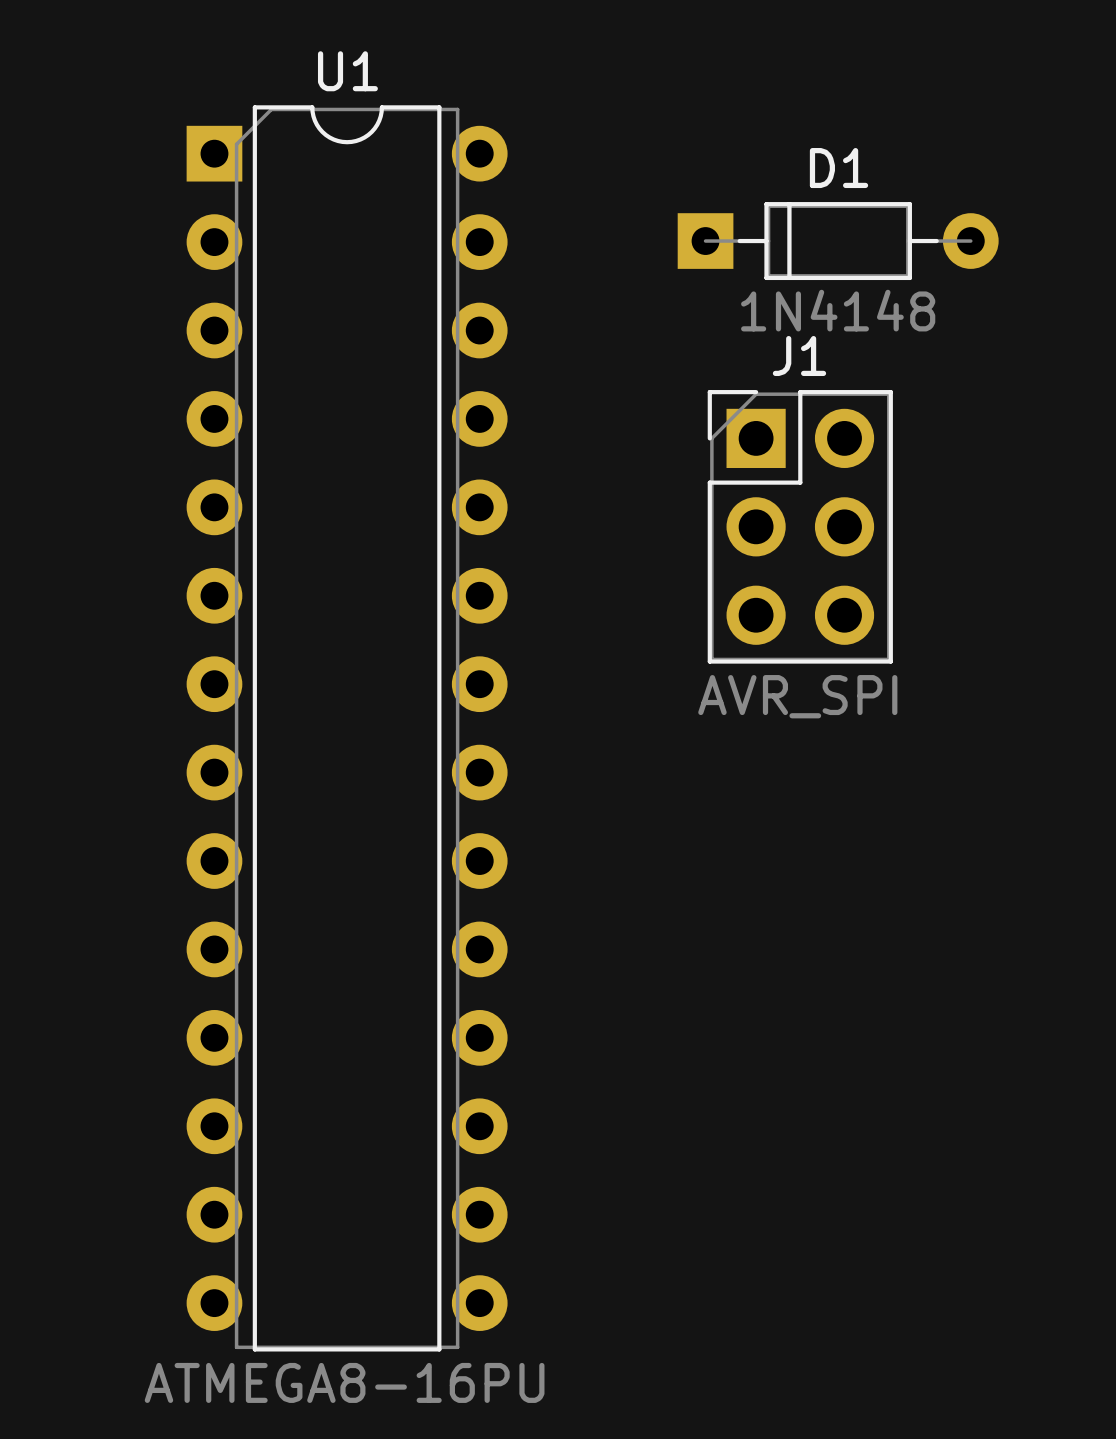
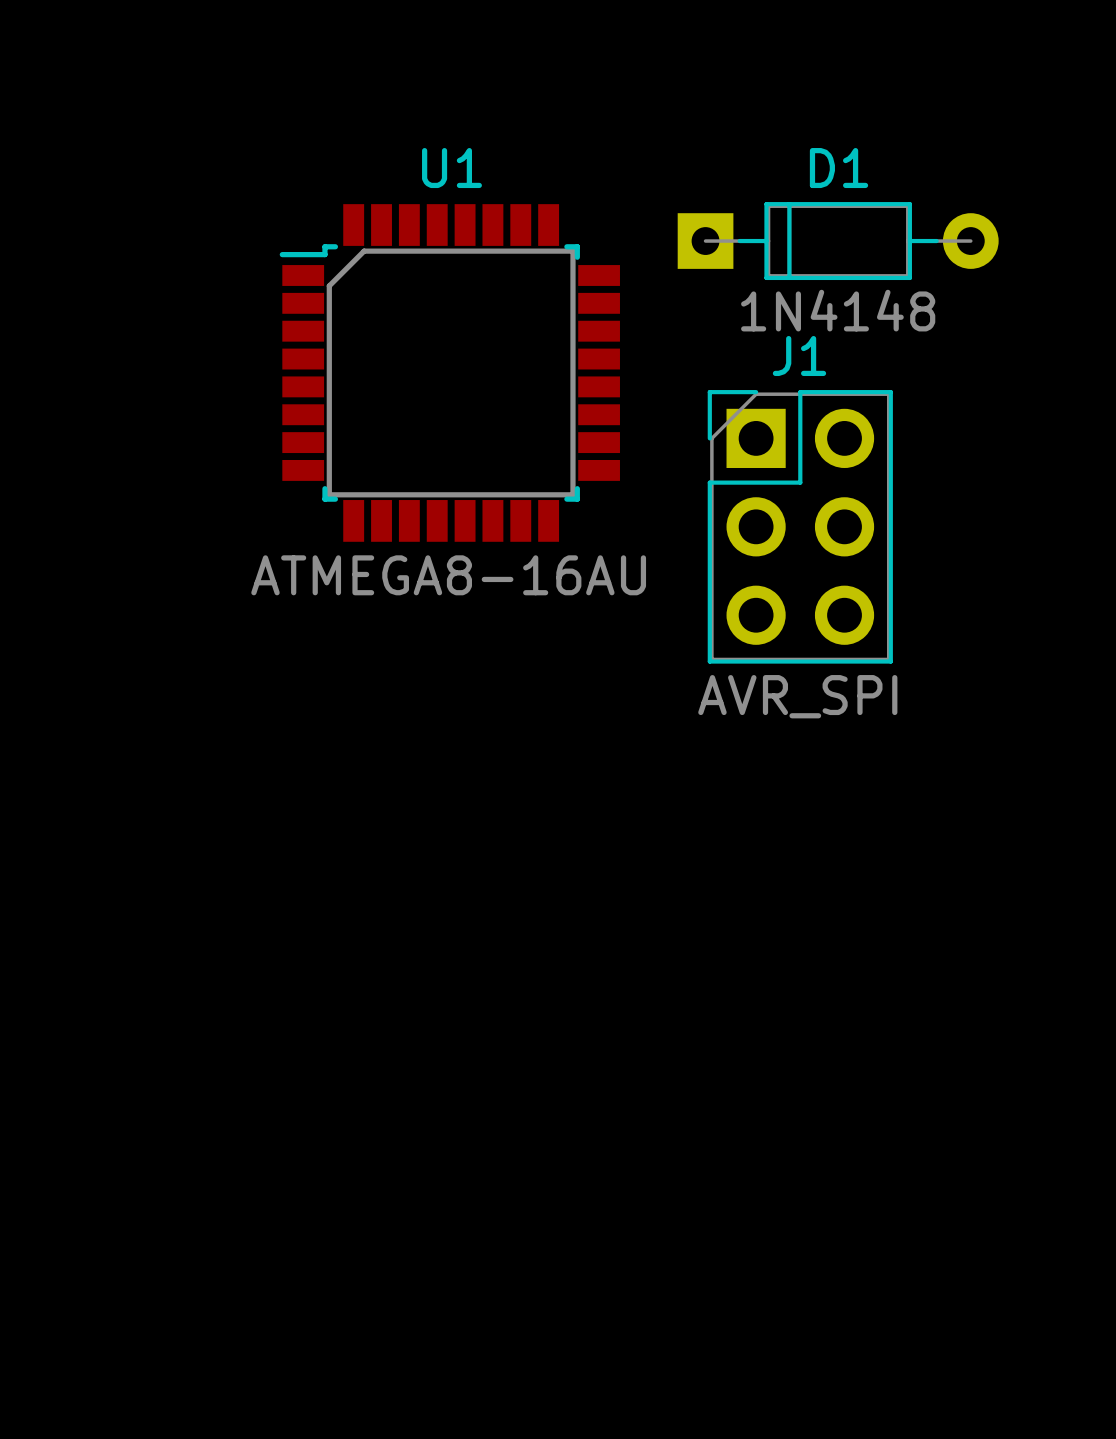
U1 name position: U1 (347, 71) -> U1 (451, 168)
U1 footprint: [186, 105, 508, 1352] -> [279, 204, 620, 542]
U1 value: ATMEGA8-16PU (344, 1382) -> ATMEGA8-16AU (448, 575)

